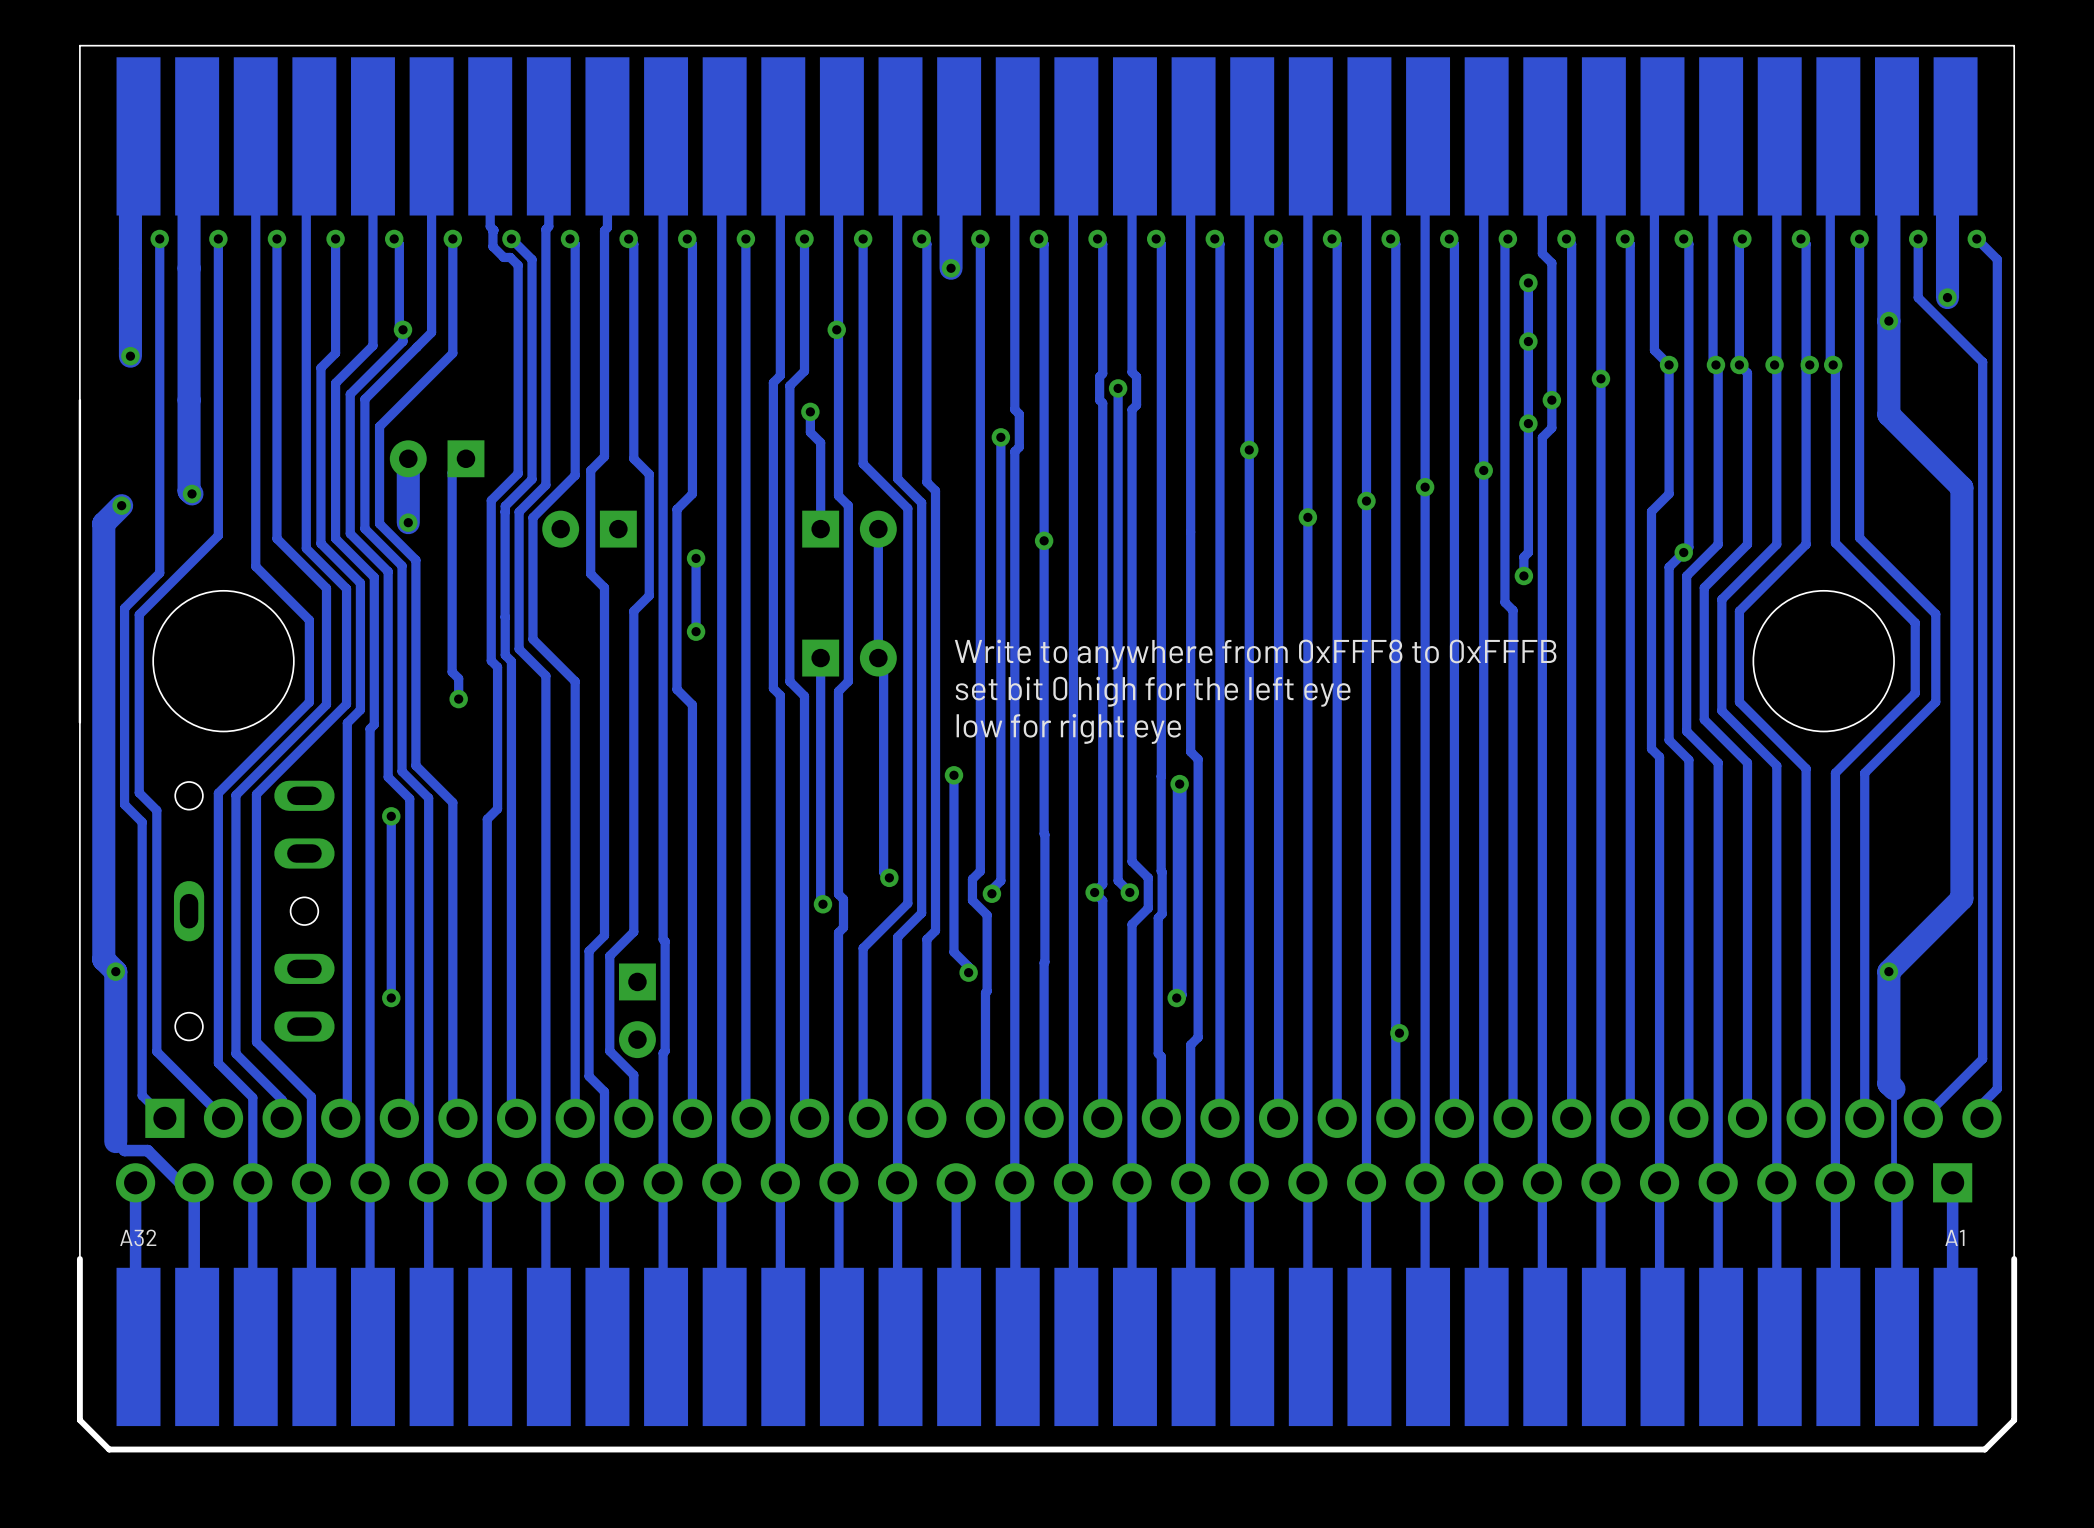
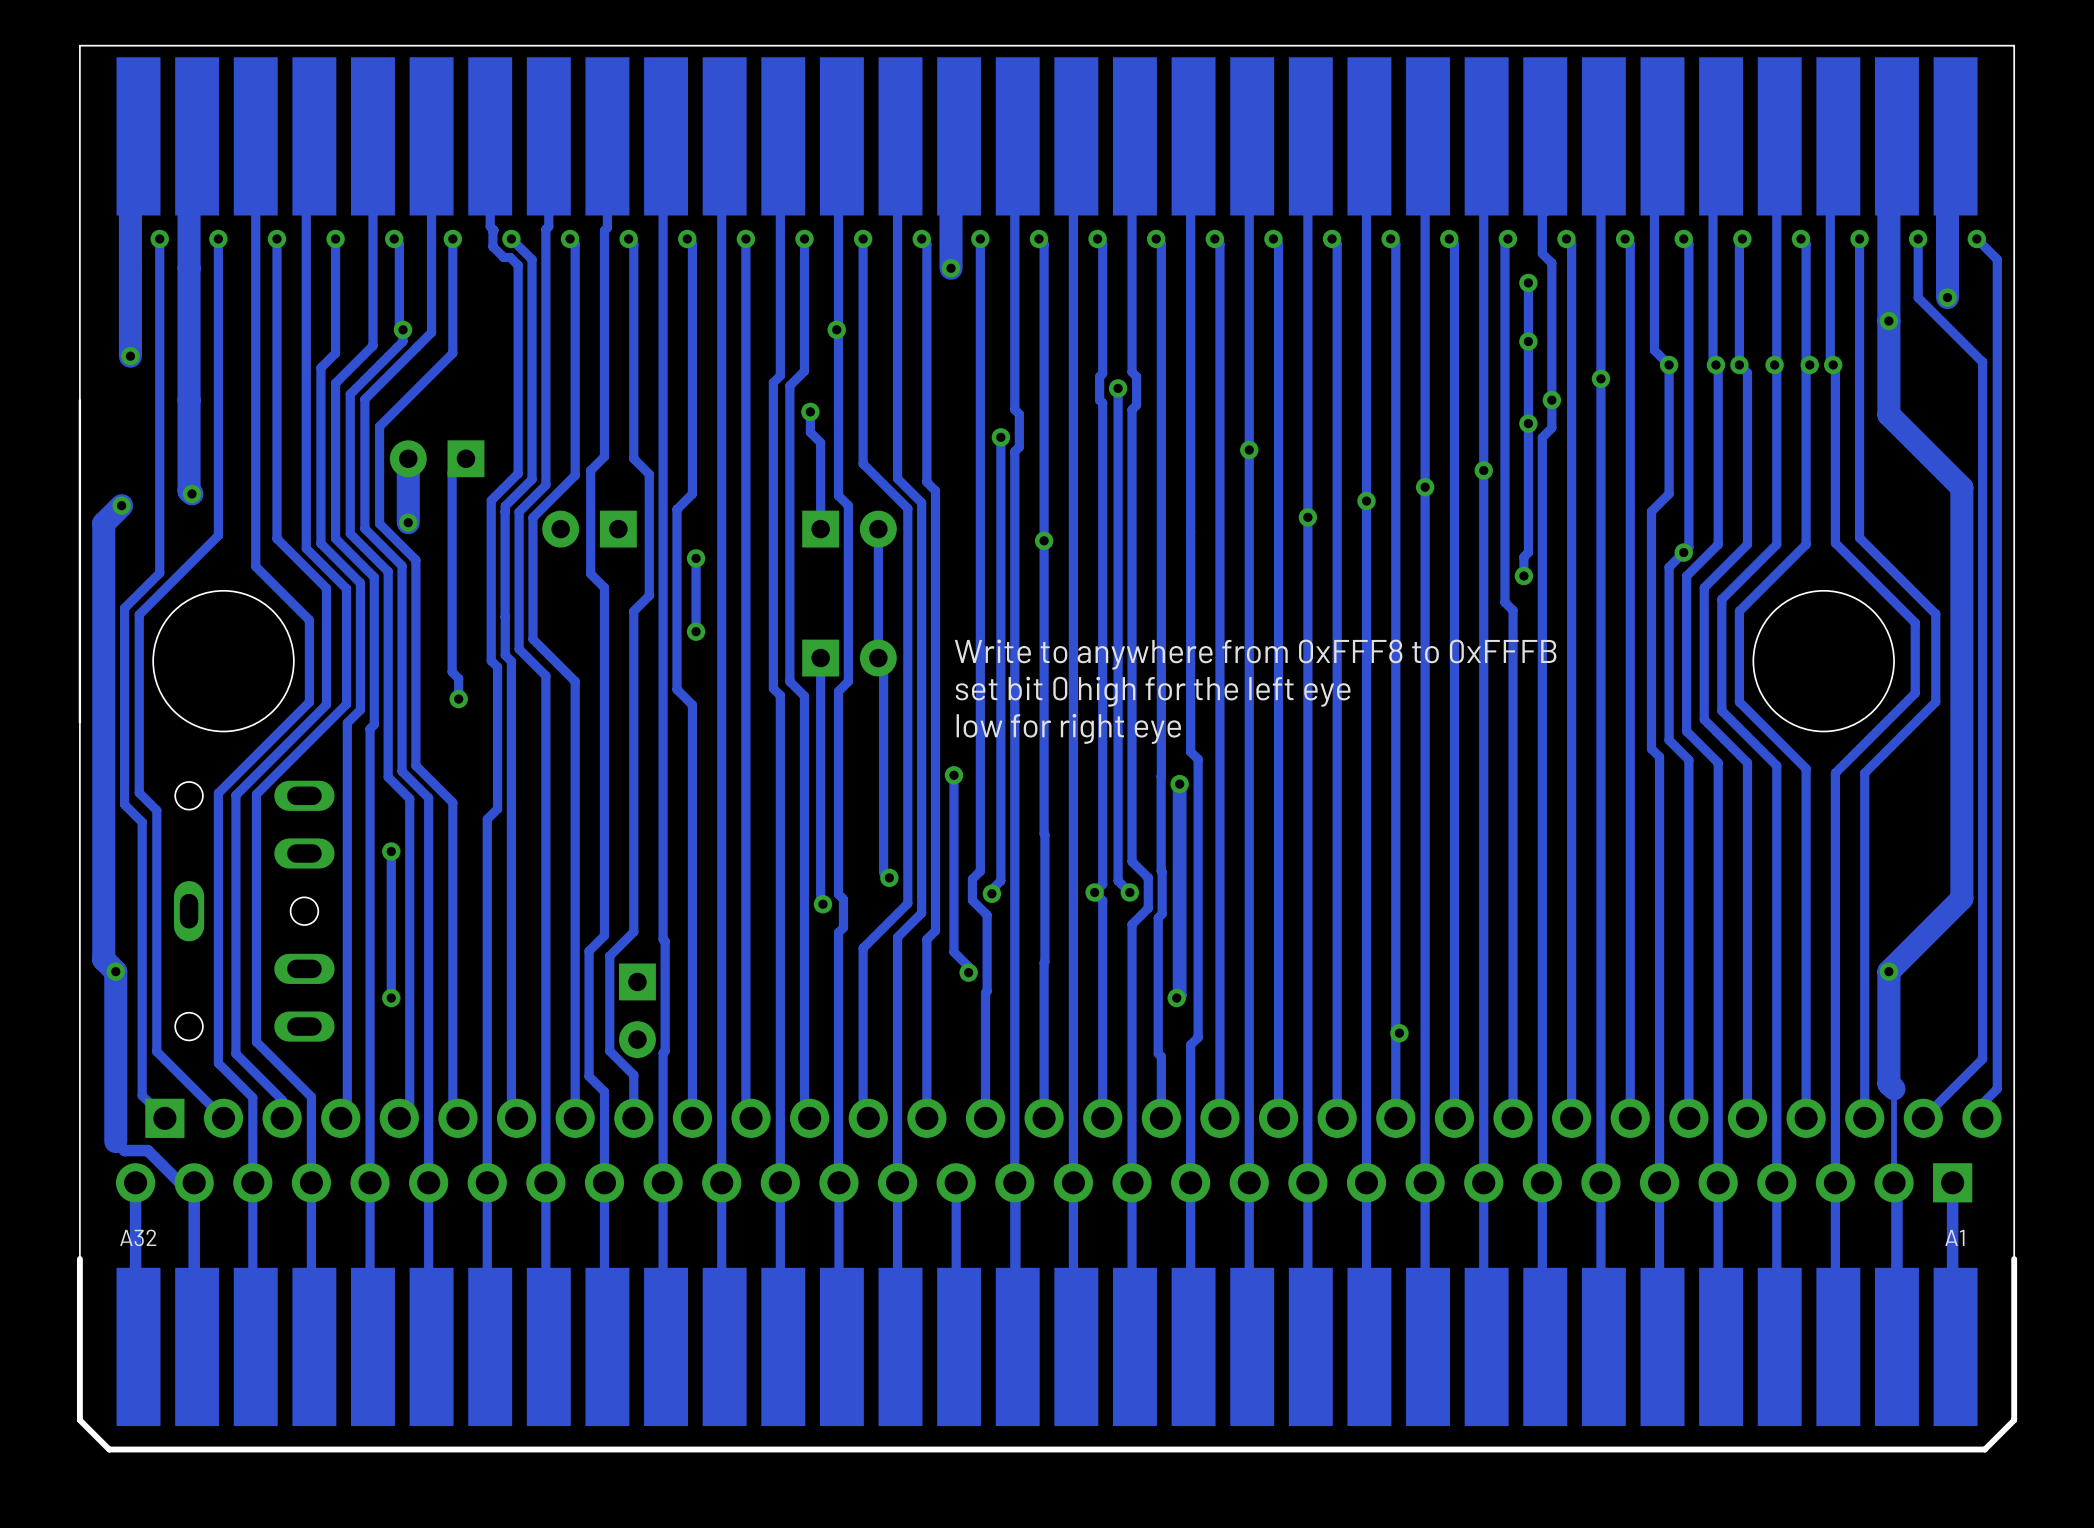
track: (391, 816) (391, 851) -> none
via position: (391, 816) -> (391, 851)

